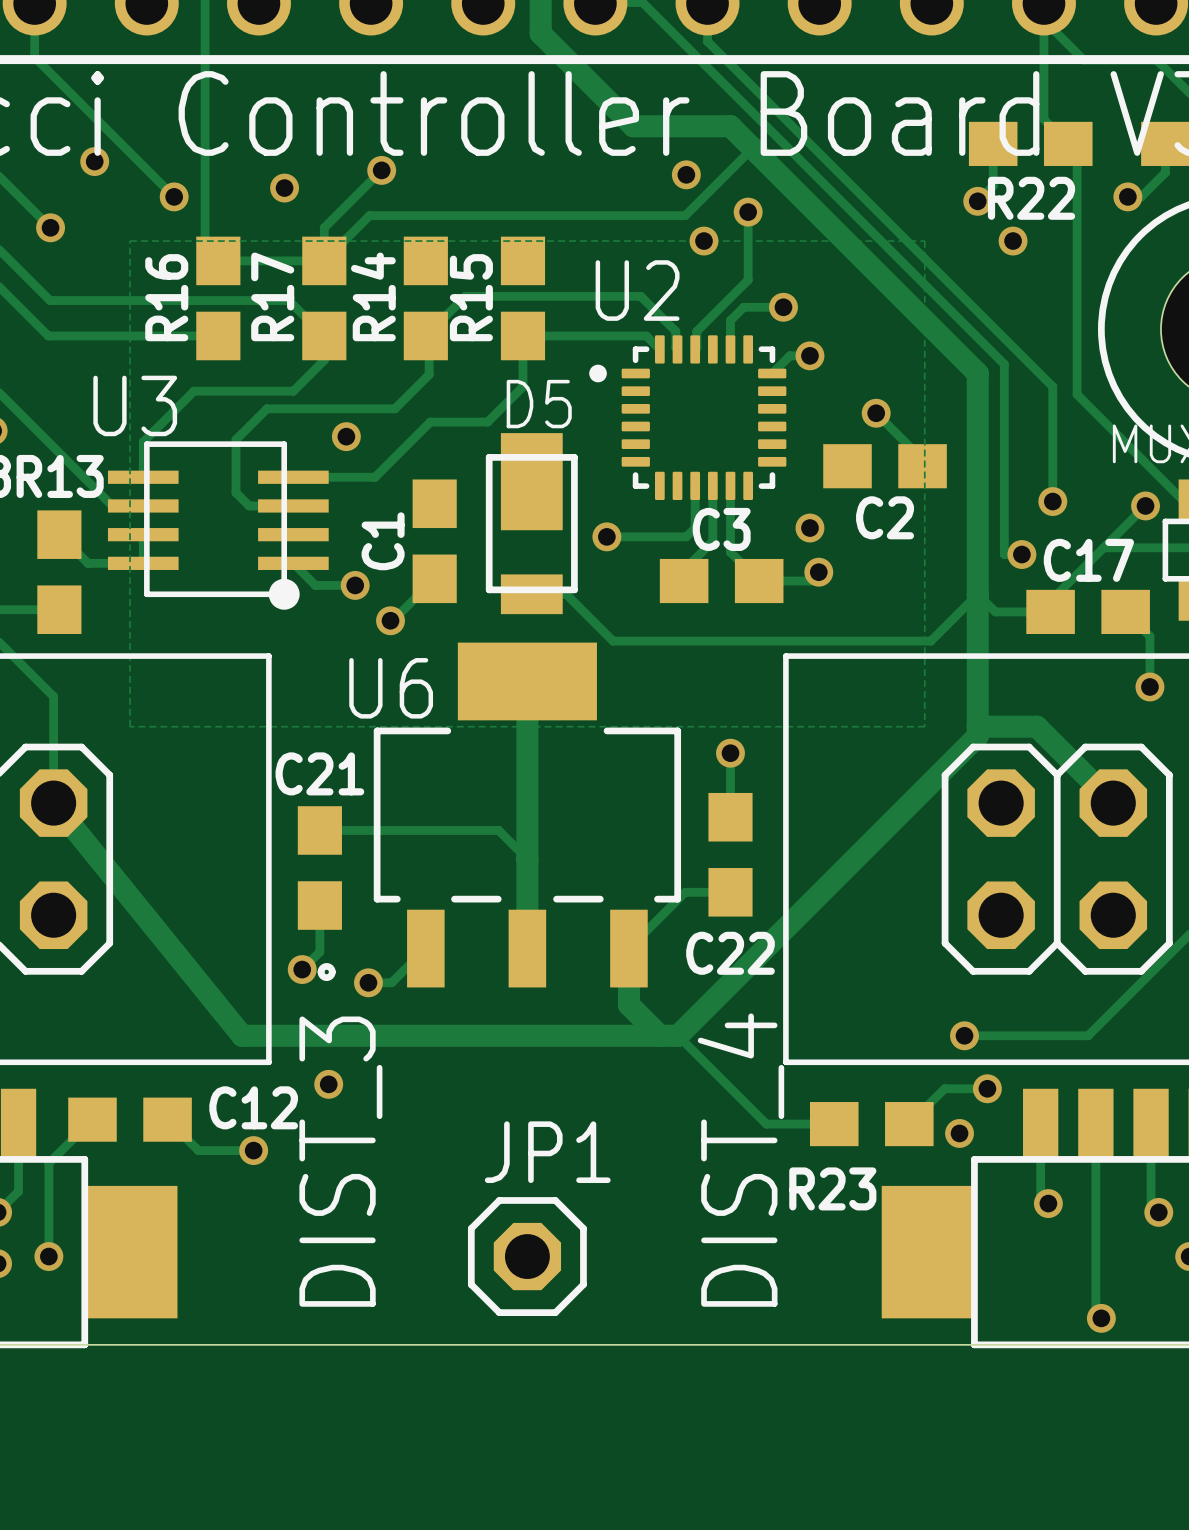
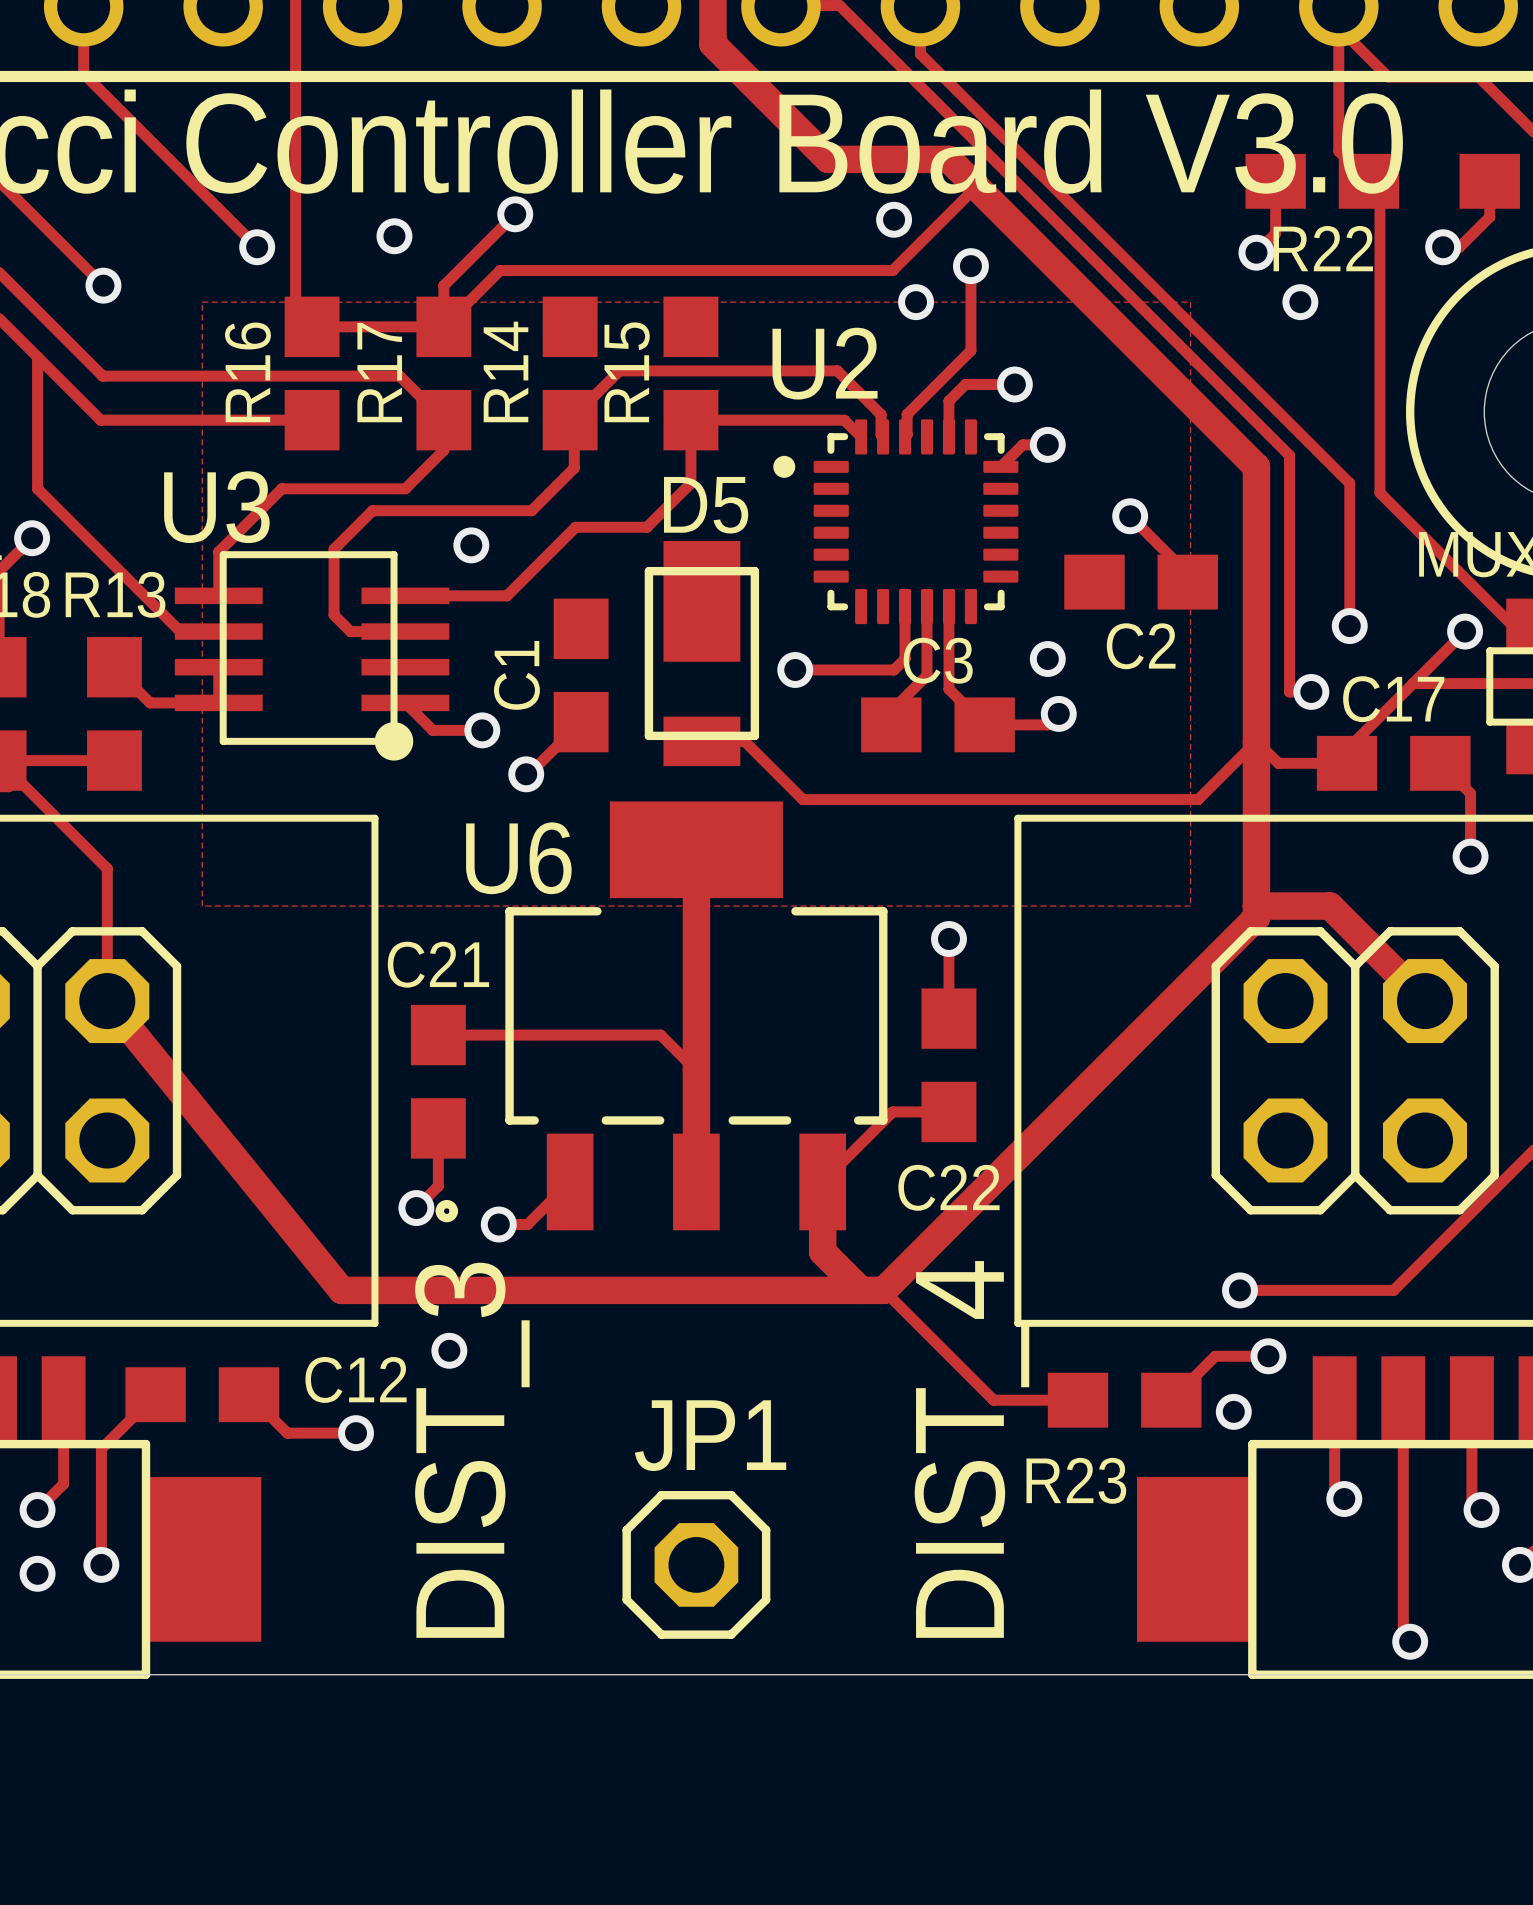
via: (94, 161) -> none

